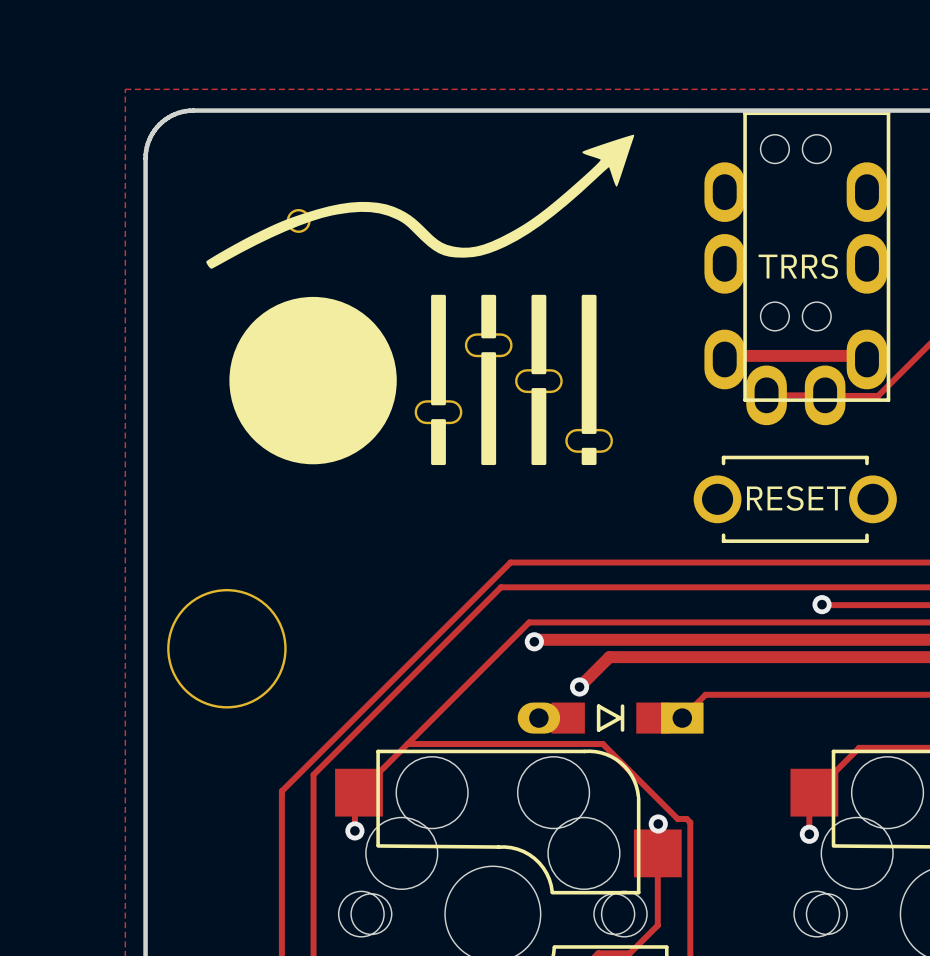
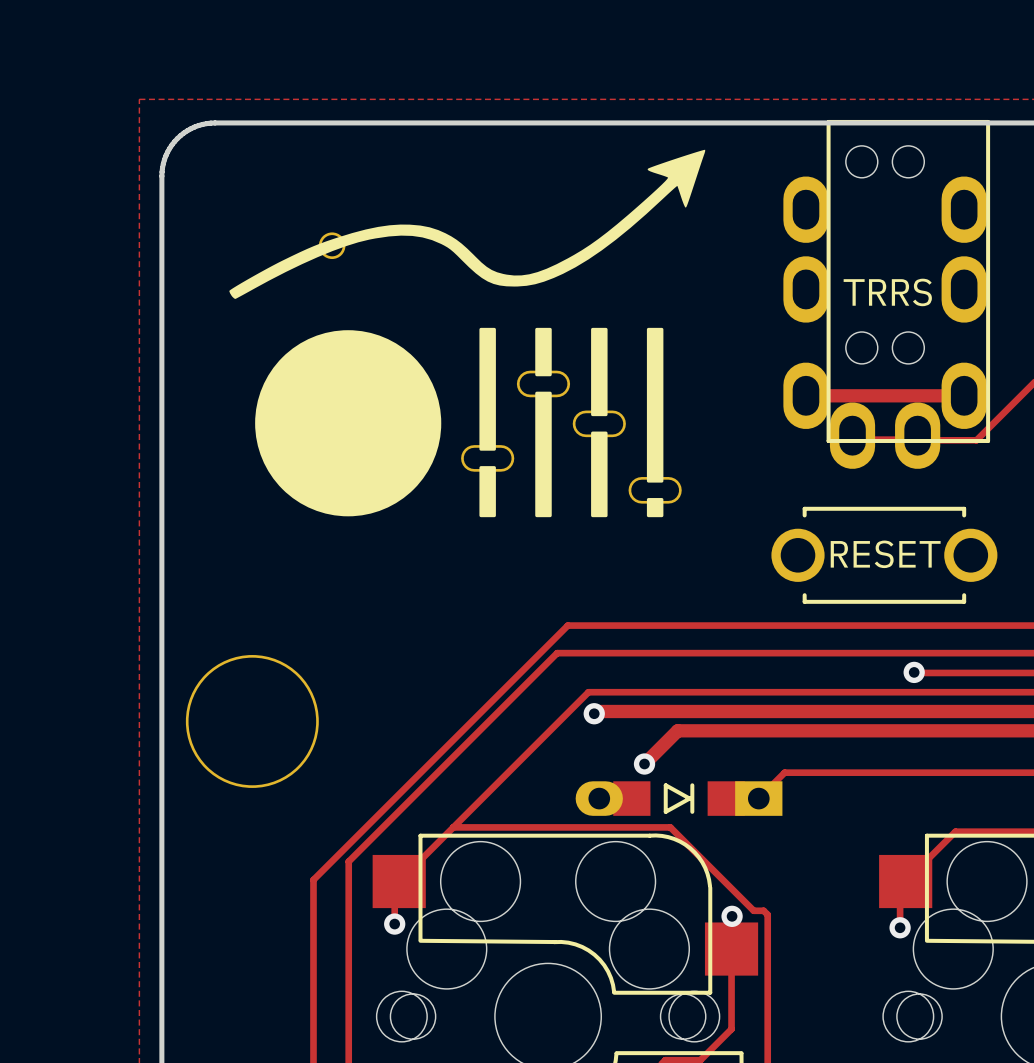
part footprint: [704, 111, 891, 426] -> [783, 119, 991, 469]

